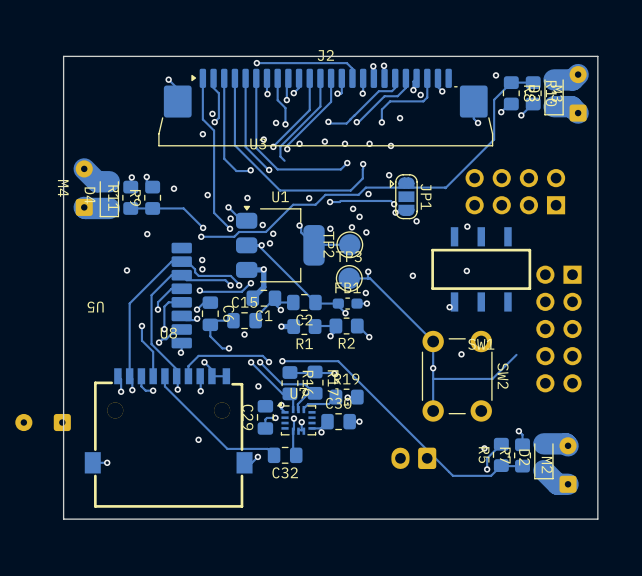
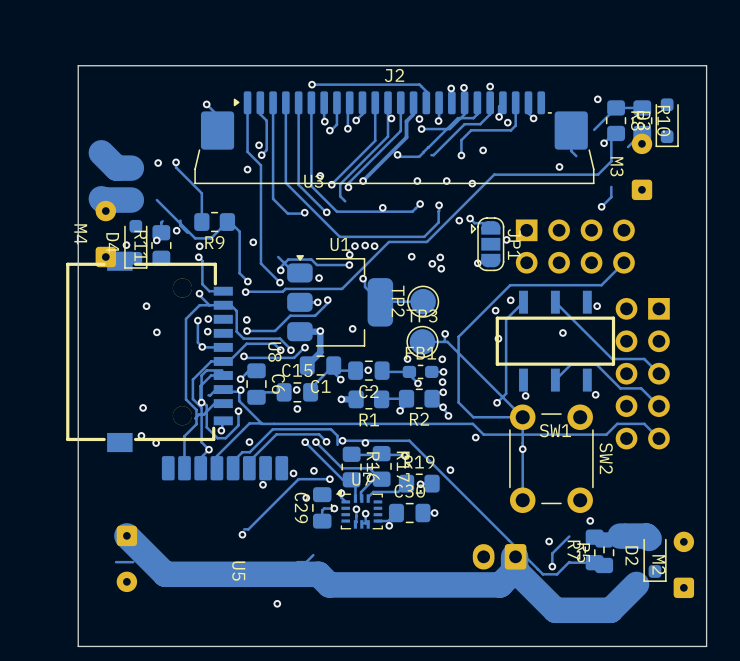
board edge: (597, 56) (63, 56) (63, 519) (597, 519) (597, 56) -> (706, 65) (706, 646) (78, 646) (78, 65) (706, 65)
via: none -> (490, 86)
track: (578, 74) (572, 79) (554, 79) -> none
track: none -> (464, 102) (464, 114) (449, 129) (421, 129)
track: (341, 87) (341, 93) (337, 93) -> (413, 114) (406, 121) (406, 137) (363, 180)
via: none -> (391, 118)
via: none -> (419, 119)
via: (337, 93) -> none
M3 position: (578, 93) -> (641, 166)
track: (277, 96) (277, 100) (285, 108) (285, 124) -> (336, 124) (329, 130)
track: (494, 99) (494, 139) (445, 188) (365, 187) (358, 194) (352, 194) -> (611, 137) (611, 161) (598, 174) (494, 174) (426, 241)
via: none -> (421, 129)
via: none -> (329, 130)
track: (554, 106) (571, 106) (578, 113) -> none
via: (521, 115) -> none
via: (276, 122) -> none
via: (356, 122) -> none
via position: (478, 122) -> (559, 166)
via: (285, 124) -> none
via: none -> (158, 163)
track: none -> (176, 162) (176, 167) (201, 193) (201, 222)
via: none -> (176, 162)
via: (324, 141) -> none
track: none -> (611, 186) (611, 197) (601, 206)
track: none -> (156, 200) (195, 238) (211, 238) (227, 222)
via: none -> (601, 206)
via: none -> (382, 207)
track: (84, 168) (97, 181) (109, 181) -> (101, 152) (116, 168) (131, 168)
track: none -> (470, 218) (474, 223) (492, 223)
via: (146, 176) -> none
via: none -> (459, 220)
via: (131, 177) -> none
via: none -> (176, 230)
via: (174, 188) -> none
part rotation: 0° (515, 191) -> 180° (575, 246)
via: none -> (156, 240)
via: none -> (506, 239)
track: (325, 194) (315, 204) (293, 204) (265, 231) (239, 231) (234, 236) (201, 236) -> (394, 241) (389, 241) (342, 288) (285, 288) (282, 291) (247, 291)
via: (368, 194) -> none
via: none -> (126, 245)
R9 name position: R9 (135, 197) -> R9 (214, 242)
R9 rotation: 0° (152, 197) -> 90° clockwise (214, 222)
R9 position: (152, 197) -> (214, 222)
via: (247, 197) -> none
via: none -> (365, 245)
via: none -> (199, 246)
via: none -> (354, 246)
track: (330, 202) (390, 200) (394, 204) -> none
via: (330, 202) -> none
via: (394, 204) -> none
via: none -> (349, 254)
track: (84, 207) (109, 208) -> (101, 198) (131, 200)
track: none -> (198, 257) (202, 260) (202, 284) (209, 291) (223, 291)
via: none -> (198, 257)
via: (228, 207) -> none
via: none -> (411, 256)
via: none -> (440, 257)
track: (130, 208) (183, 208) (196, 221) -> (227, 222) (230, 222) (239, 231) (239, 273)
via: (353, 208) -> none
track: none -> (623, 262) (601, 285) (510, 285) (458, 336) (458, 402) (473, 417) (522, 417)
via: none -> (432, 263)
track: none -> (349, 265) (316, 265) (311, 259) (288, 259) (279, 268)
via: none -> (349, 265)
via: (359, 216) -> none
via: none -> (441, 268)
via: (416, 221) -> none
via: (467, 226) -> none
via: (351, 227) -> none
via: (330, 228) -> none
via: (366, 232) -> none
via: (273, 233) -> none
via: (147, 234) -> none
track: none -> (199, 293) (209, 305)
via: none -> (199, 293)
track: none -> (327, 300) (327, 303) (315, 315) (290, 315) (275, 330) (247, 330)
via: none -> (510, 300)
track: (258, 245) (315, 302) -> none
track: none -> (523, 302) (506, 319) (506, 393) (497, 402)
track: none -> (555, 302) (612, 359) (644, 359) (658, 373)
via: none -> (146, 306)
via: none -> (597, 306)
via: none -> (495, 310)
via: none -> (208, 319)
track: none -> (197, 320) (197, 342) (202, 347) (223, 347)
via: none -> (197, 320)
via: none -> (352, 328)
via: none -> (207, 331)
SW1 position: (481, 269) -> (555, 341)
track: (225, 280) (186, 280) (181, 275) (171, 275) (151, 295) (151, 344) (176, 369) (177, 389) -> (274, 344) (246, 343) (229, 361) (211, 361) (192, 379) (192, 399) (201, 407) (201, 442) (208, 449) (200, 457) (200, 468)
via: none -> (202, 346)
track: (239, 284) (230, 275) (198, 275) (187, 261) (171, 261) (129, 303) (129, 376) (132, 378) (132, 390) -> (290, 349) (280, 338) (243, 338) (236, 331) (236, 311) (230, 305) (199, 305) (186, 318) (186, 399) (196, 409) (196, 424) (184, 436) (184, 468)
track: (181, 288) (171, 288) (157, 302) (157, 309) -> none
via: none -> (407, 359)
U5 rotation: 0° (181, 295) -> 90° clockwise (225, 468)
U5 position: (181, 295) -> (225, 468)
via: none -> (368, 370)
track: none -> (223, 375) (211, 375) (200, 386) (200, 399) (206, 405) (206, 427) (217, 438) (225, 438) (238, 425) (238, 411)
U5 name position: U5 (95, 307) -> U5 (238, 571)
via: (449, 307) -> none
via: (157, 309) -> none
track: none -> (555, 380) (570, 364) (596, 364) (620, 388) (641, 388) (658, 406)
via: none -> (442, 382)
track: none -> (223, 389) (216, 389) (208, 395)
via: none -> (296, 389)
track: none -> (239, 390) (239, 401) (261, 423)
via: none -> (443, 392)
via: none -> (595, 394)
via: none -> (525, 395)
track: (210, 324) (210, 336) (222, 348) (229, 348) -> none
track: (141, 326) (141, 340) (153, 351) (153, 376) -> none
via: (141, 326) -> none
via: none -> (497, 402)
part position: (558, 329) -> (642, 373)
via: none -> (143, 407)
via: none -> (443, 407)
via: none -> (238, 411)
via: (369, 337) -> none
via: none -> (448, 415)
via: (159, 342) -> none
track: none -> (261, 423) (249, 423) (216, 456) (216, 468)
track: none -> (261, 423) (472, 423) (483, 434) (606, 434) (617, 423) (644, 423) (658, 438)
via: (229, 348) -> none
via: (461, 354) -> none
track: (516, 354) (492, 378) (433, 378) -> none
track: (227, 355) (198, 355) (188, 366) (188, 376) -> (276, 434) (249, 461) (249, 468)
via: none -> (141, 435)
via: none -> (475, 437)
track: (204, 362) (211, 369) (211, 376) (226, 376) -> none
via: none -> (365, 442)
via: none -> (156, 443)
track: none -> (337, 444) (337, 435) (330, 429) (272, 429) (249, 452) (242, 452) (233, 461) (233, 468)
via: none -> (208, 449)
track: (117, 376) (121, 379) (121, 391) -> none
track: (141, 376) (141, 386) (145, 390) (153, 390) -> none
track: (164, 376) (164, 386) (227, 448) (267, 448) (274, 455) -> none
via: none -> (450, 470)
via: none -> (293, 473)
via: (177, 389) -> none
via: (132, 390) -> none
via: (153, 390) -> none
via: (121, 391) -> none
via position: (200, 391) -> (263, 484)
track: none -> (329, 479) (298, 479) (248, 529) (244, 529)
via: none -> (329, 479)
via: none -> (306, 497)
part rotation: 0° (43, 422) -> 90° counterclockwise (126, 558)
part position: (43, 422) -> (126, 558)
via: none -> (590, 520)
track: (293, 431) (293, 452) (296, 455) -> none
via: (518, 431) -> none
U8 rotation: 0° (168, 437) -> 90° clockwise (149, 351)
U8 position: (168, 437) -> (149, 351)
track: none -> (126, 535) (165, 574) (318, 574) (329, 584) (500, 584) (515, 569) (515, 556)
track: (543, 443) (566, 443) (568, 445) -> (620, 536) (646, 536) (649, 538)
track: (501, 444) (487, 458) (487, 469) -> (569, 536) (552, 553) (552, 566)
via: none -> (549, 541)
via: (484, 448) -> none
C32: (285, 455) -> none
R7 position: (522, 455) -> (594, 549)
via: (257, 456) -> none
track: none -> (513, 556) (513, 568) (555, 610) (610, 610) (636, 584)
via: (107, 462) -> none
via: none -> (552, 566)
track: (522, 466) (501, 465) (491, 475) (453, 475) (450, 472) -> (594, 562) (569, 562) (557, 574) (542, 574)
via: (487, 469) -> none
track: (543, 470) (557, 484) (568, 484) -> none
via: none -> (277, 603)

